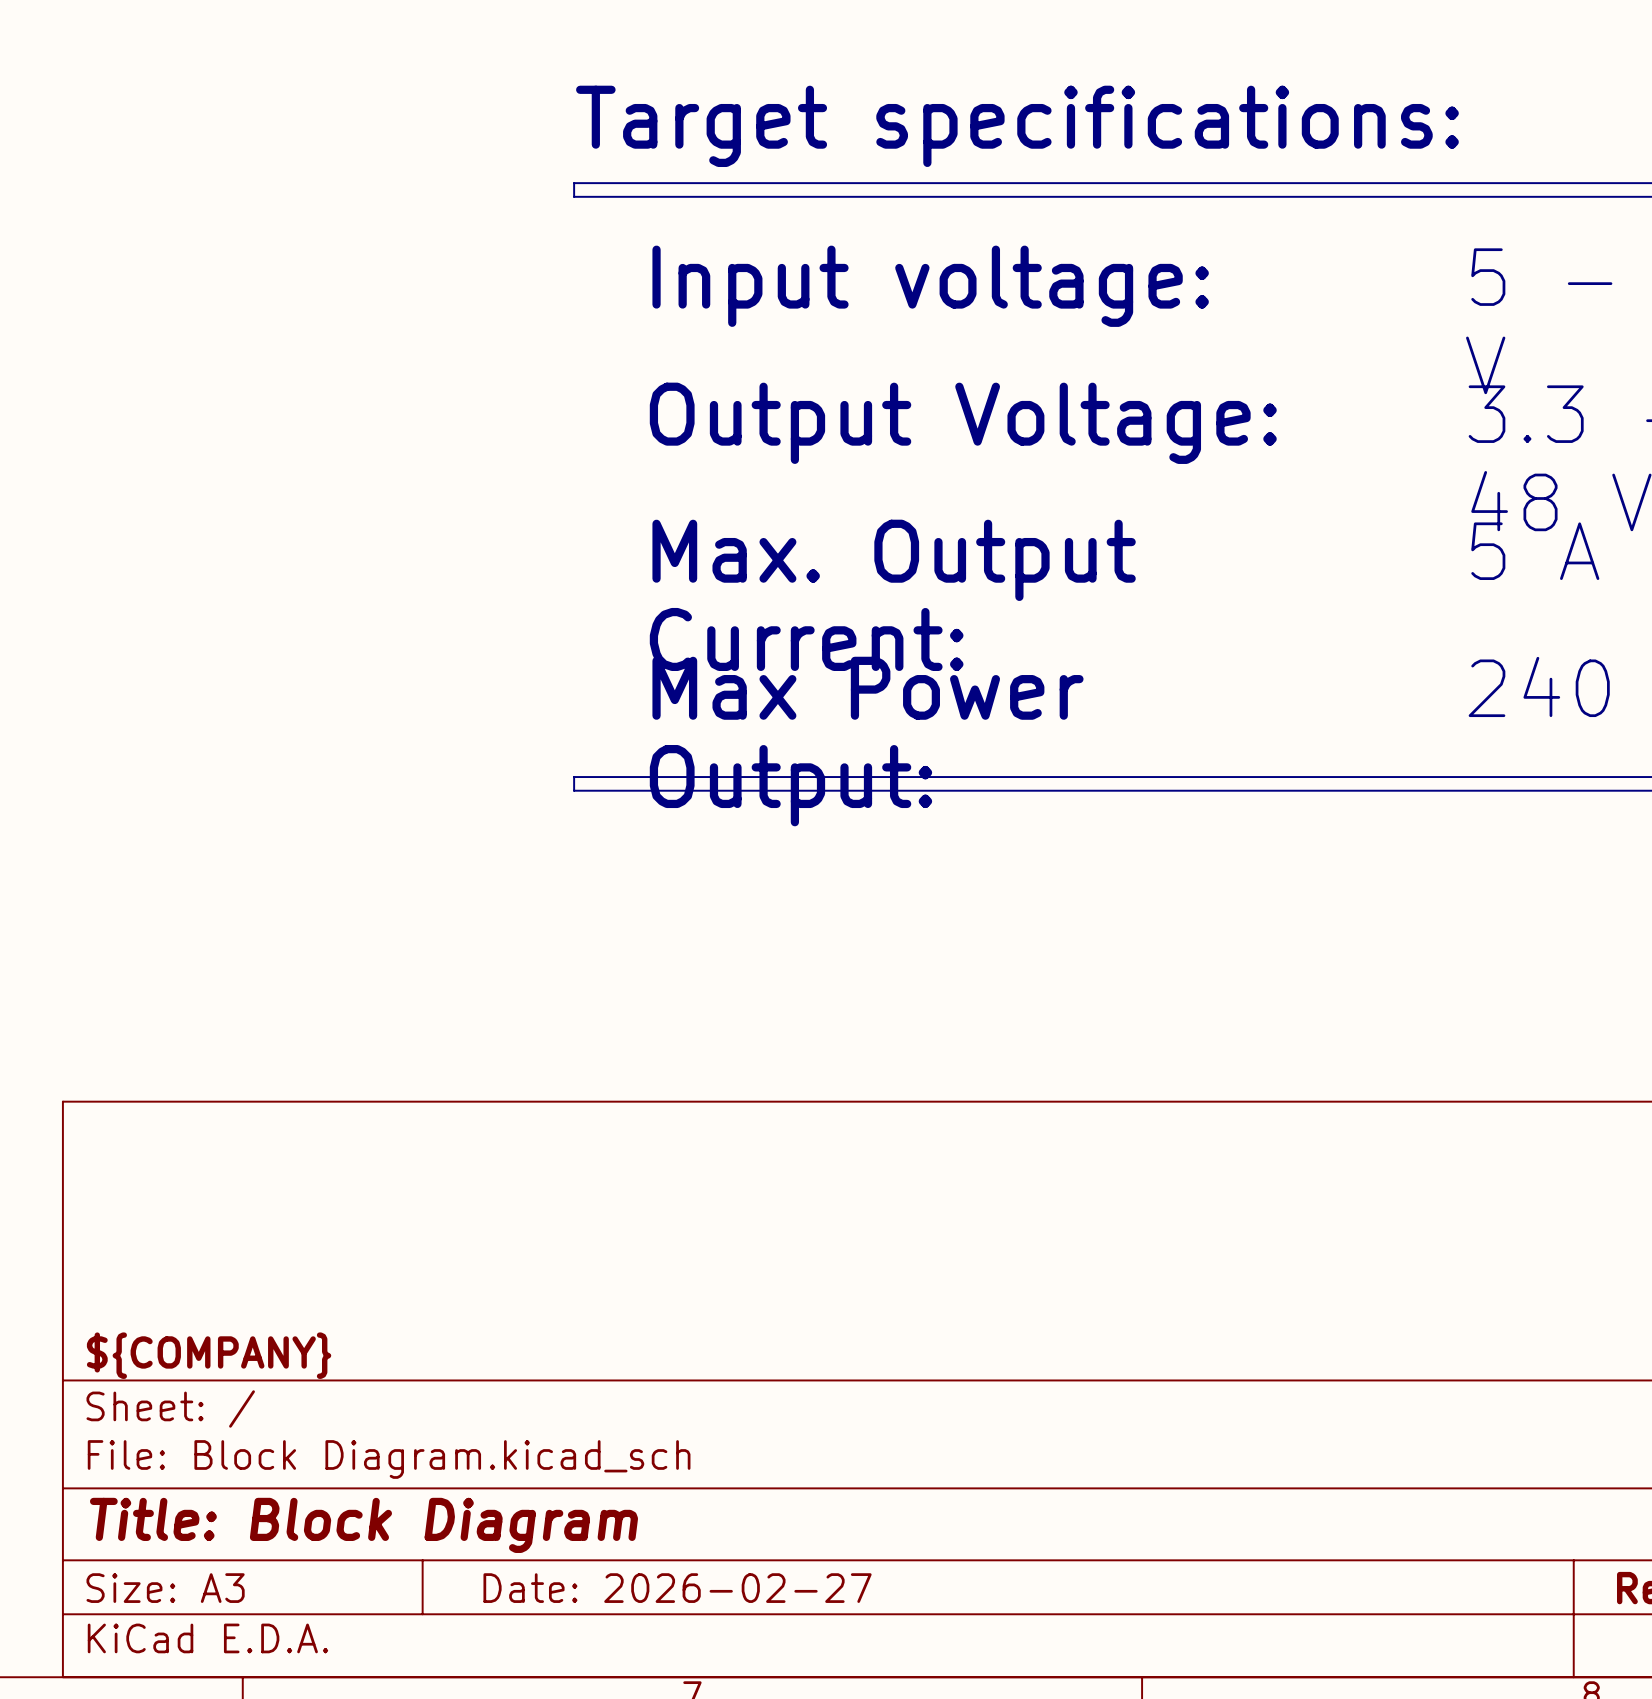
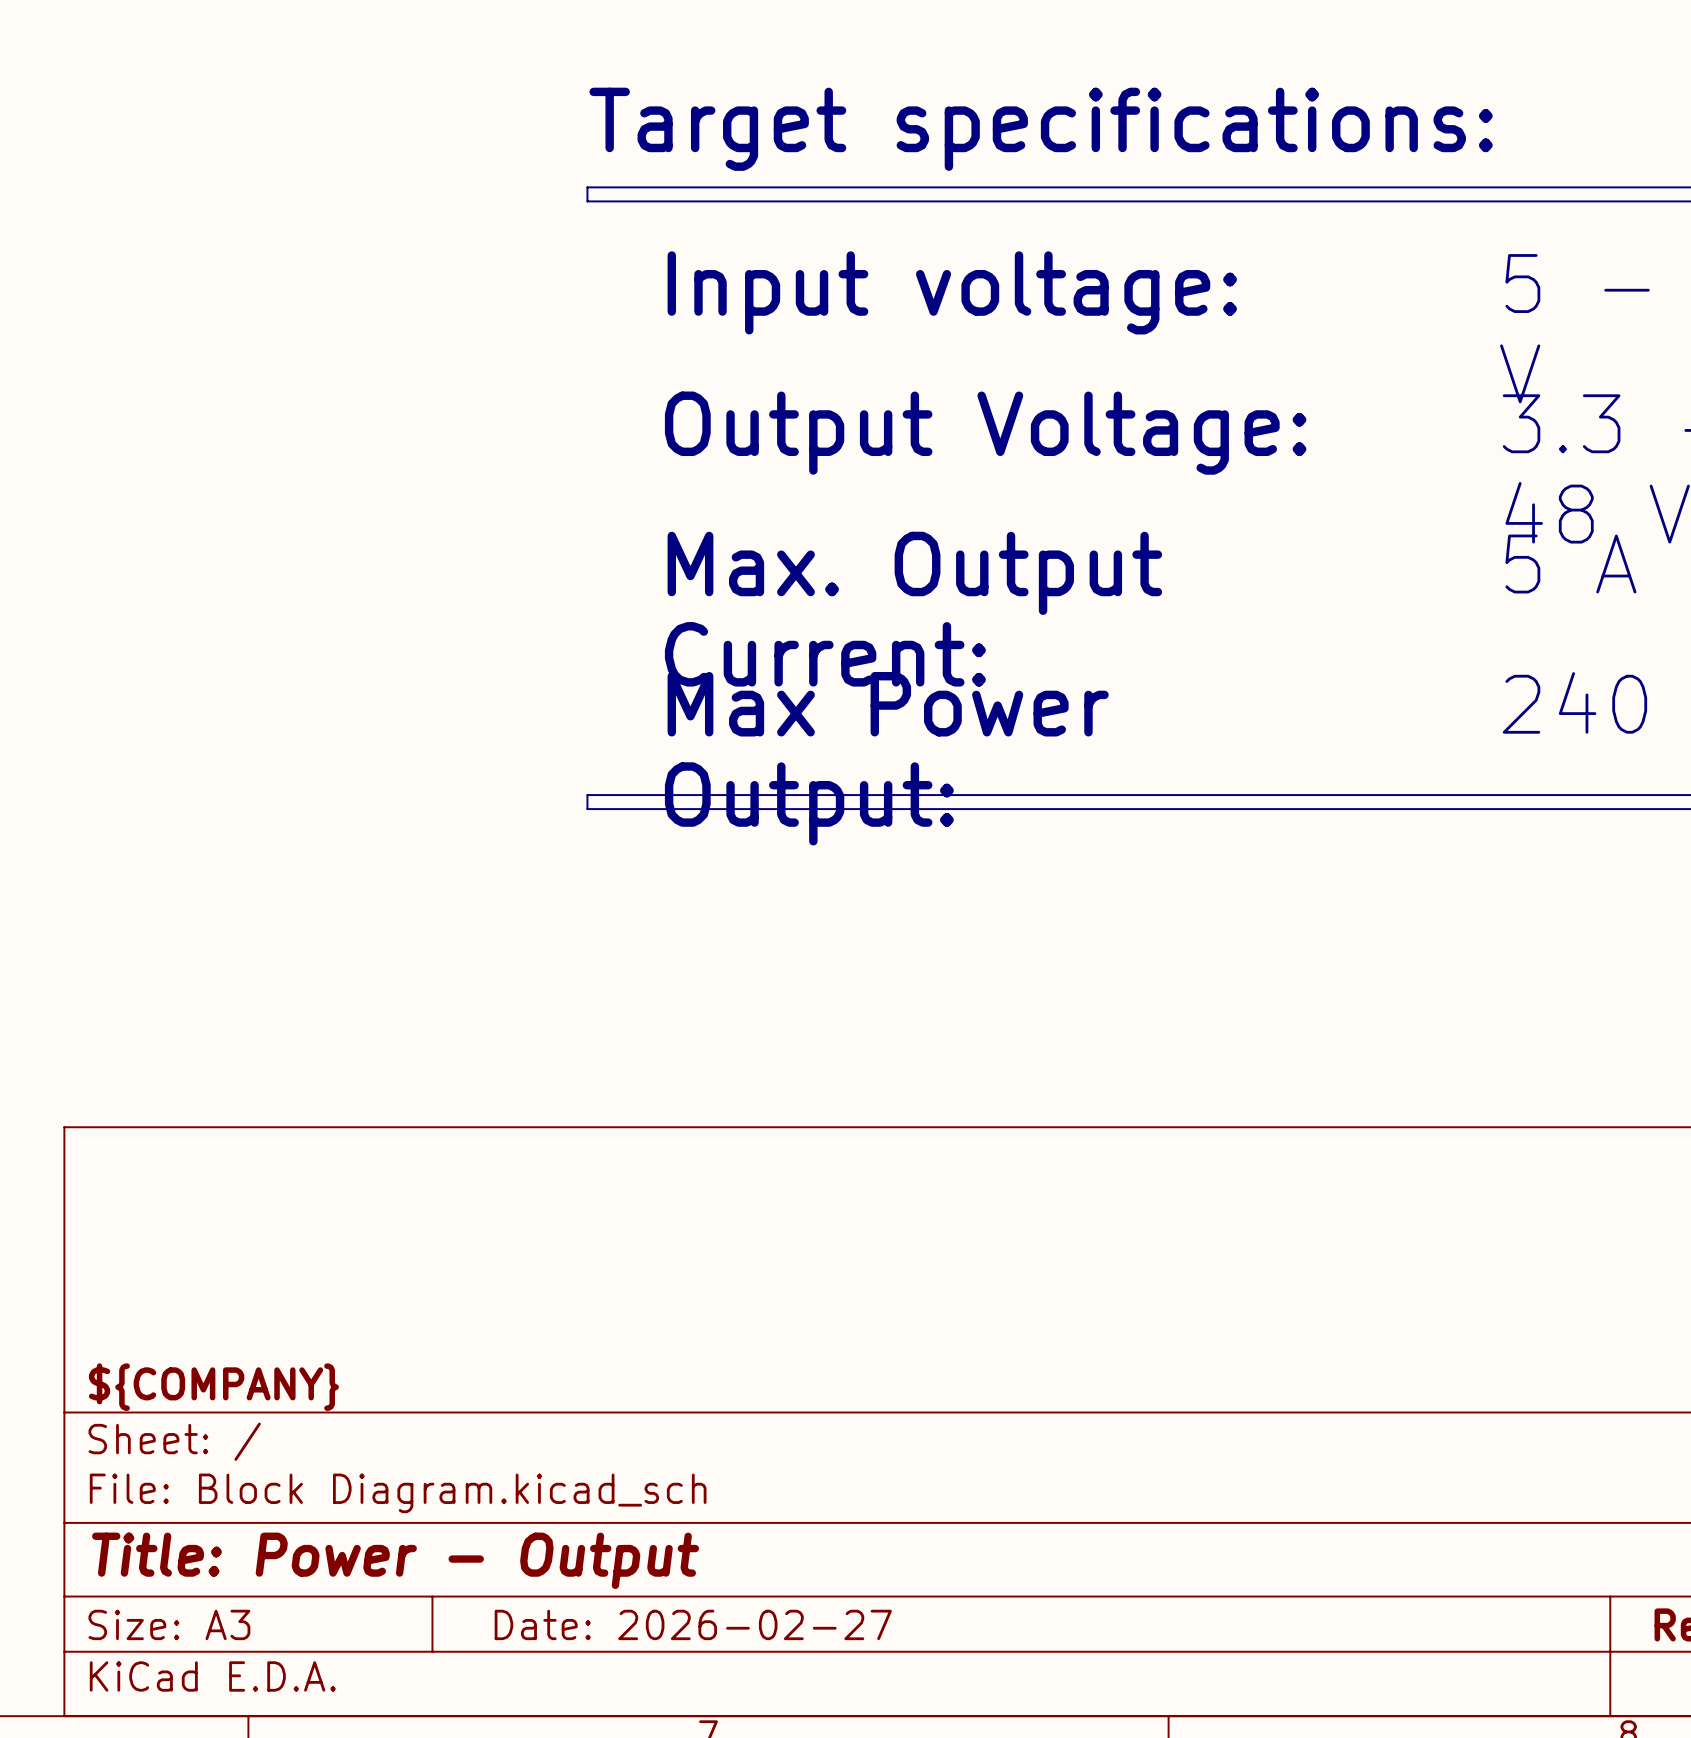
title block: Title: Block Diagram (363, 1525) -> Title: Power - Output (395, 1560)

